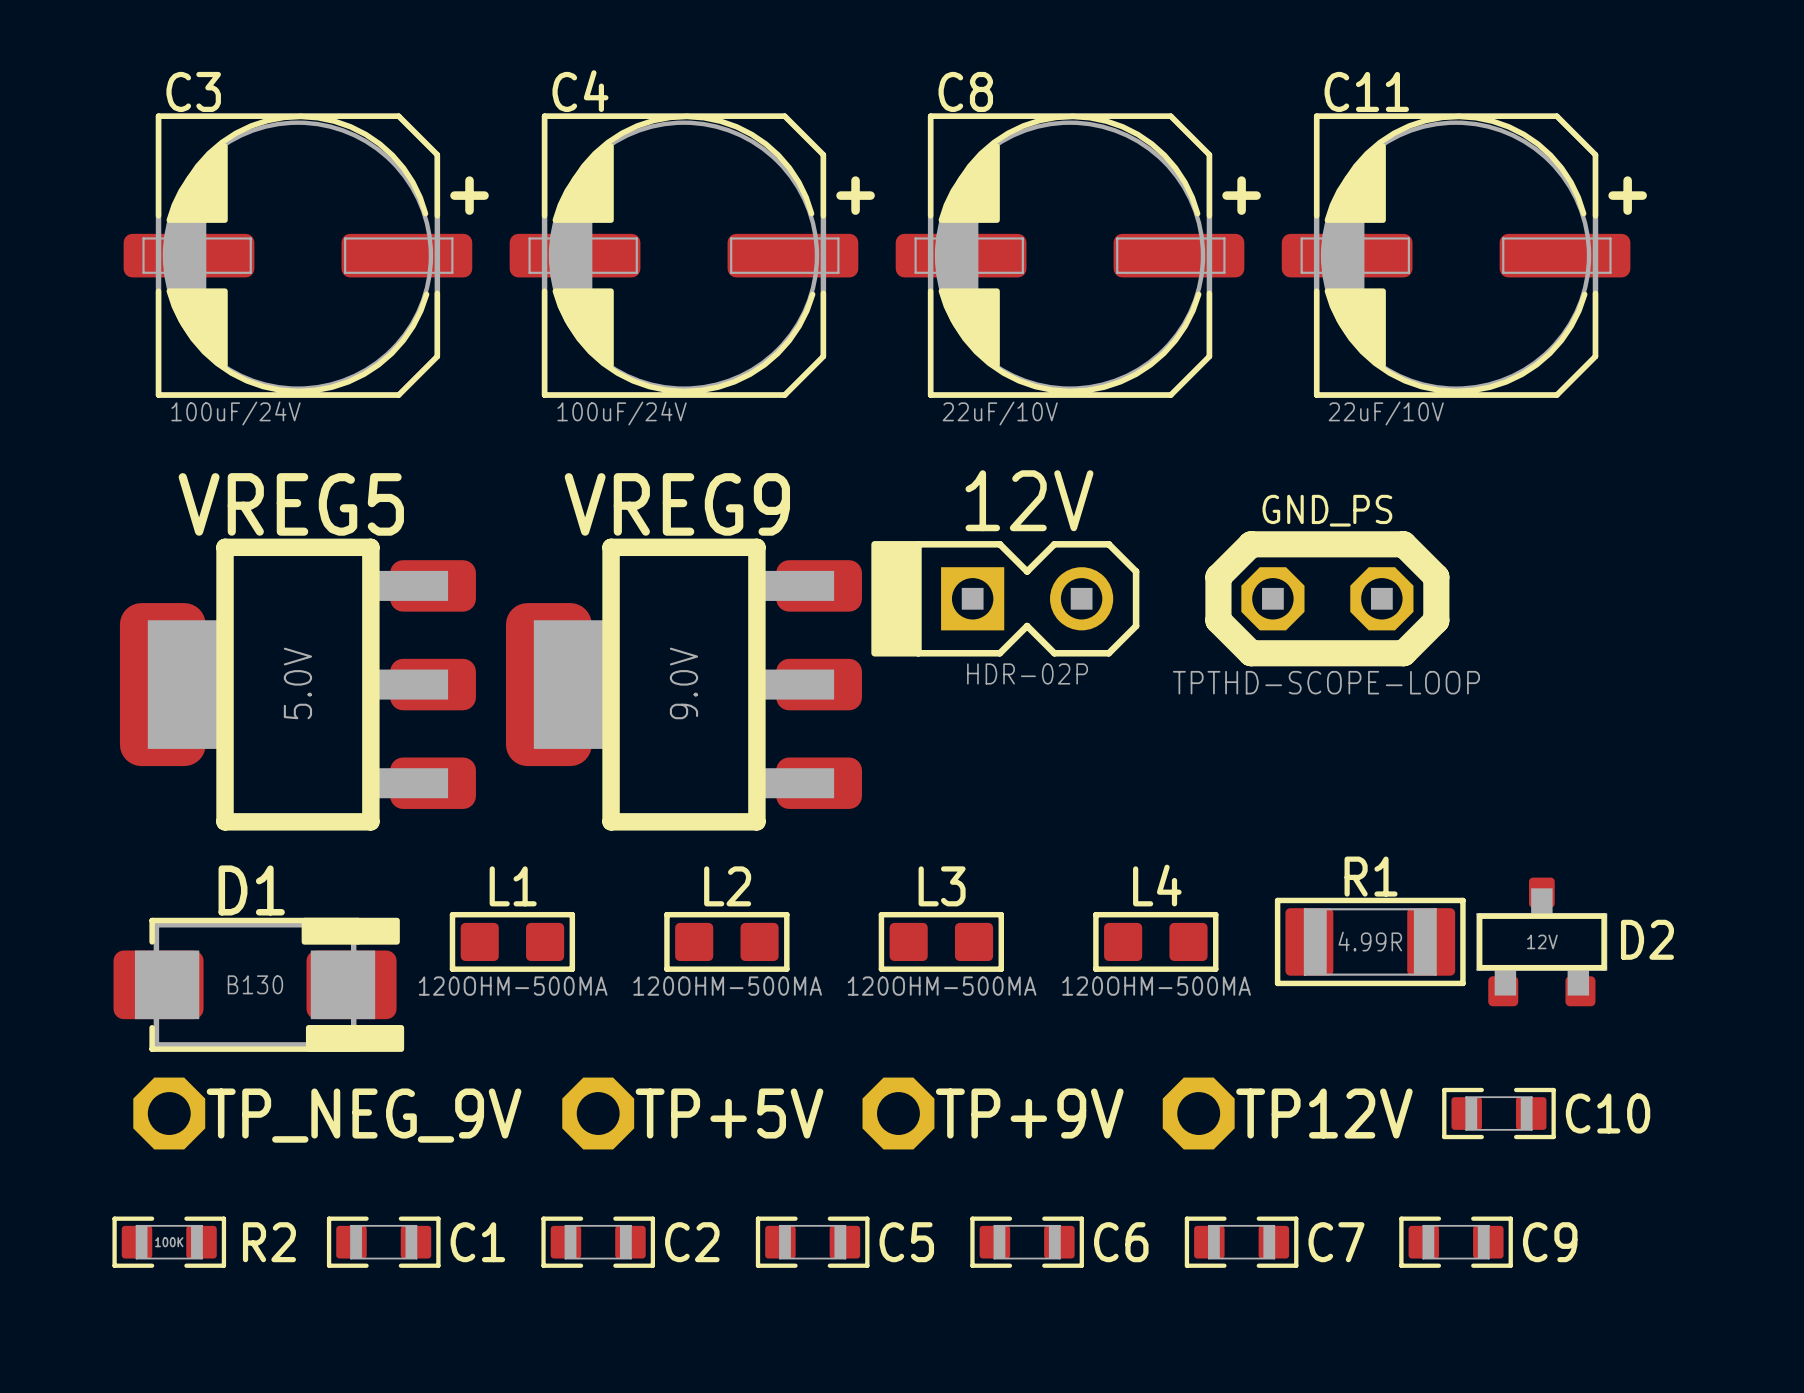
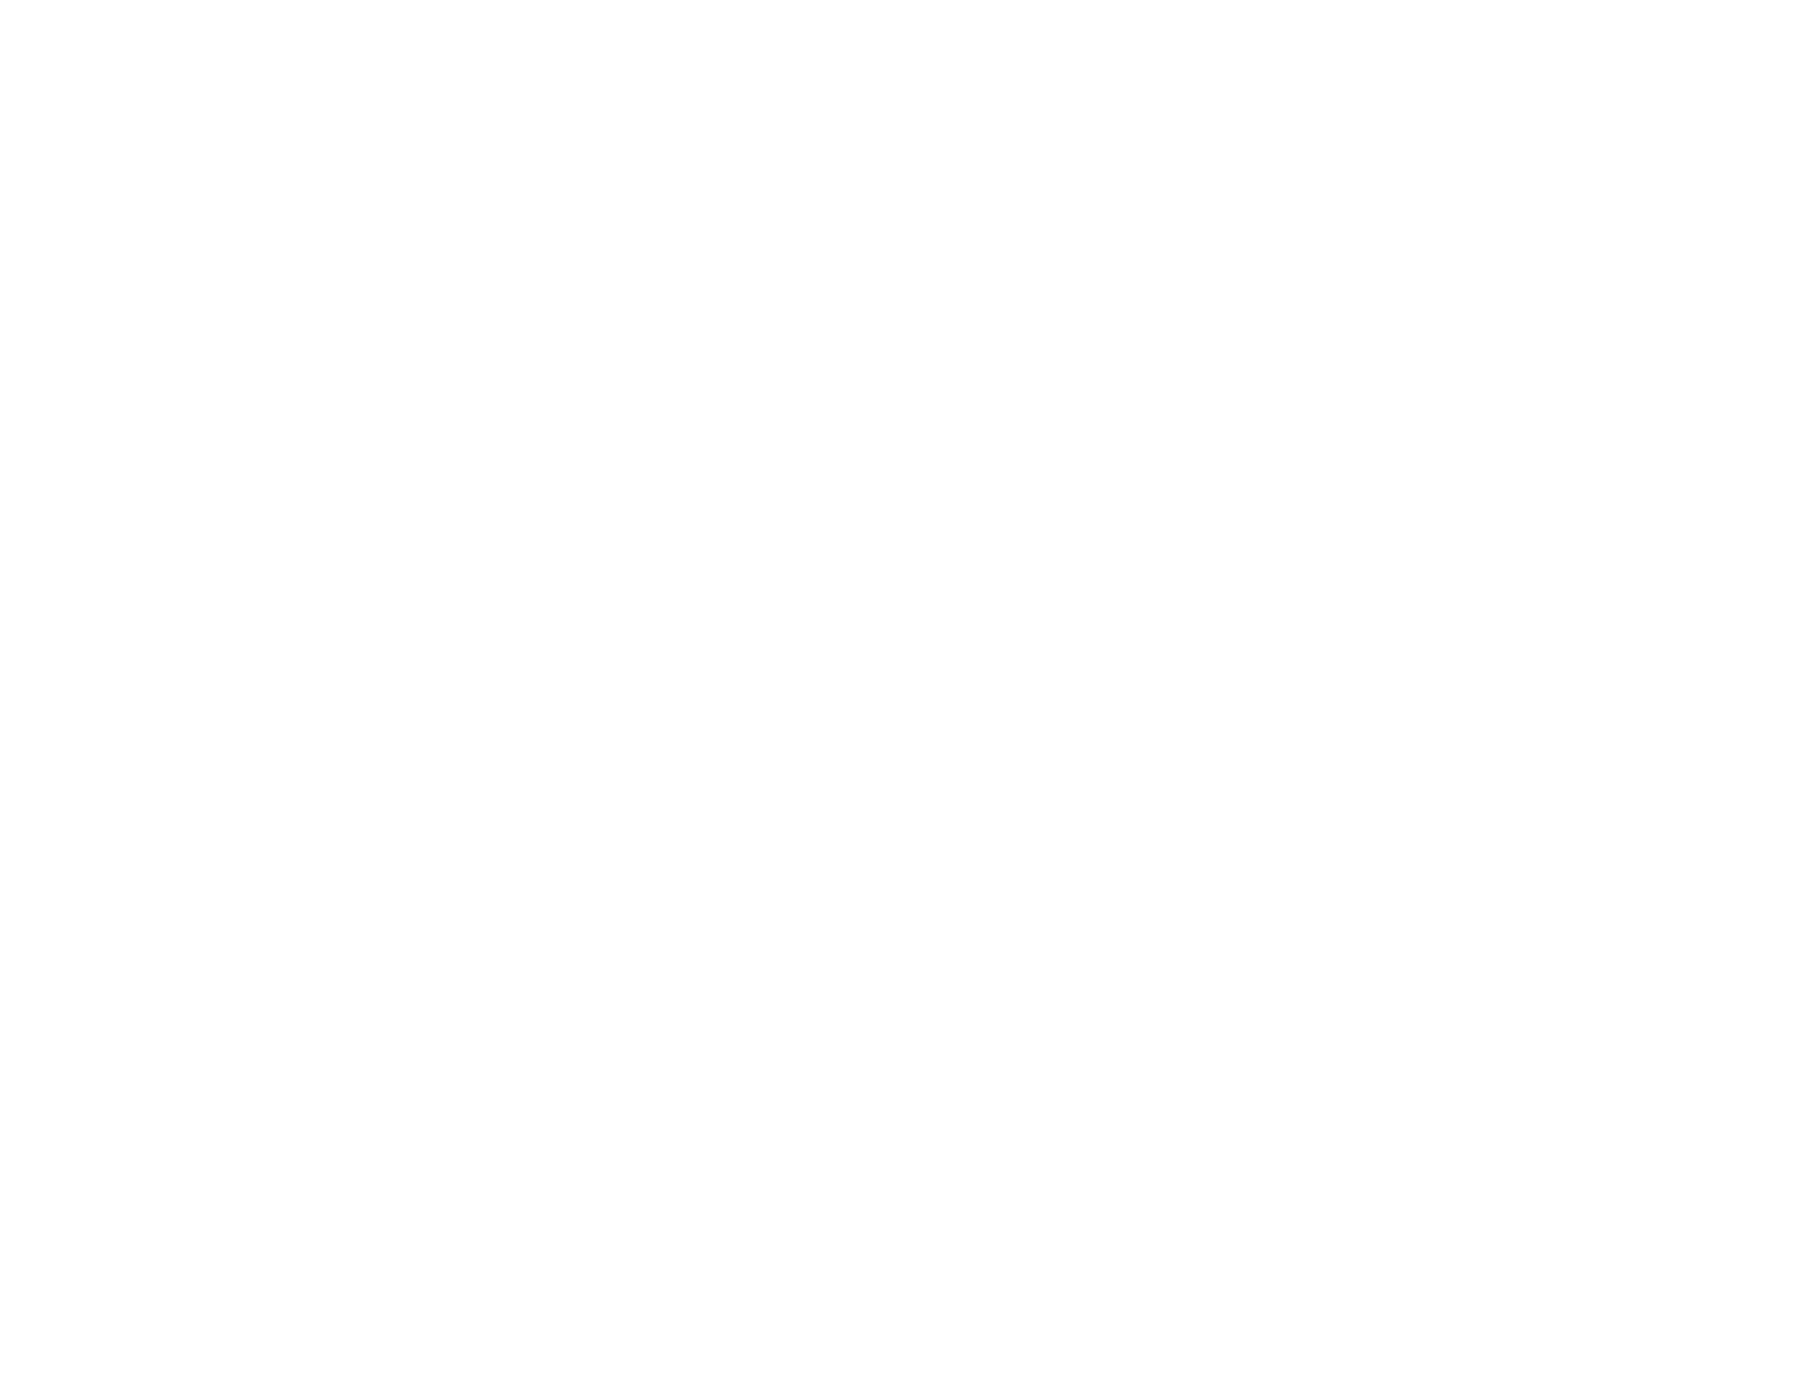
C3: 100uF/24V (306, 255) -> none
C4: 100uF/24V (692, 255) -> none
C8: 22uF/10V (1078, 255) -> none
C11: 22uF/10V (1464, 255) -> none
12V: HDR-02P (1005, 598) -> none
GND_PS: TPTHD-SCOPE-LOOP (1327, 598) -> none
VREG5: 5.0V (297, 684) -> none
VREG9: 9.0V (683, 684) -> none
L1: 120OHM-500MA (512, 941) -> none
L2: 120OHM-500MA (726, 941) -> none
L3: 120OHM-500MA (941, 941) -> none
L4: 120OHM-500MA (1155, 941) -> none
R1: 4.99R (1370, 941) -> none
D2: 12V (1541, 941) -> none
D1: B130 (258, 984) -> none
TP_NEG_9V: (169, 1113) -> none
TP+5V: (598, 1113) -> none
TP+9V: (898, 1113) -> none
TP12V: (1198, 1113) -> none
C10: (1498, 1113) -> none
R2: 100K (169, 1242) -> none
C1: (383, 1242) -> none
C2: (598, 1242) -> none
C5: (812, 1242) -> none
C6: (1027, 1242) -> none
C7: (1241, 1242) -> none
C9: (1456, 1242) -> none

